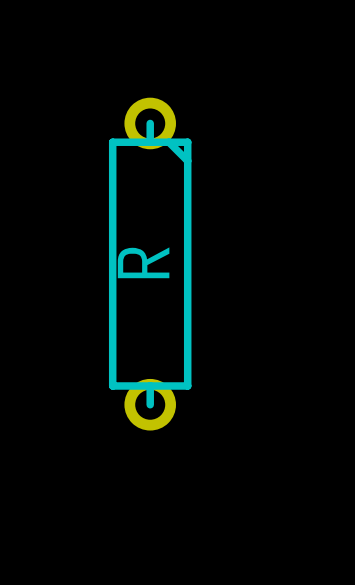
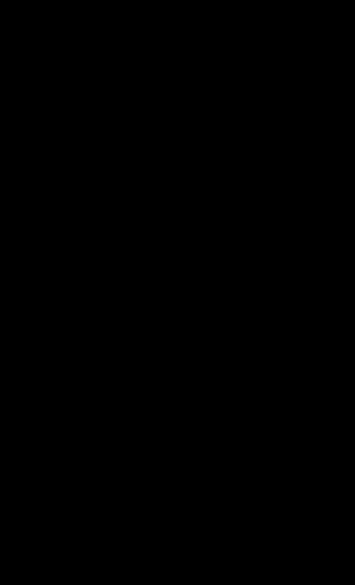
part: R (150, 264) -> none

